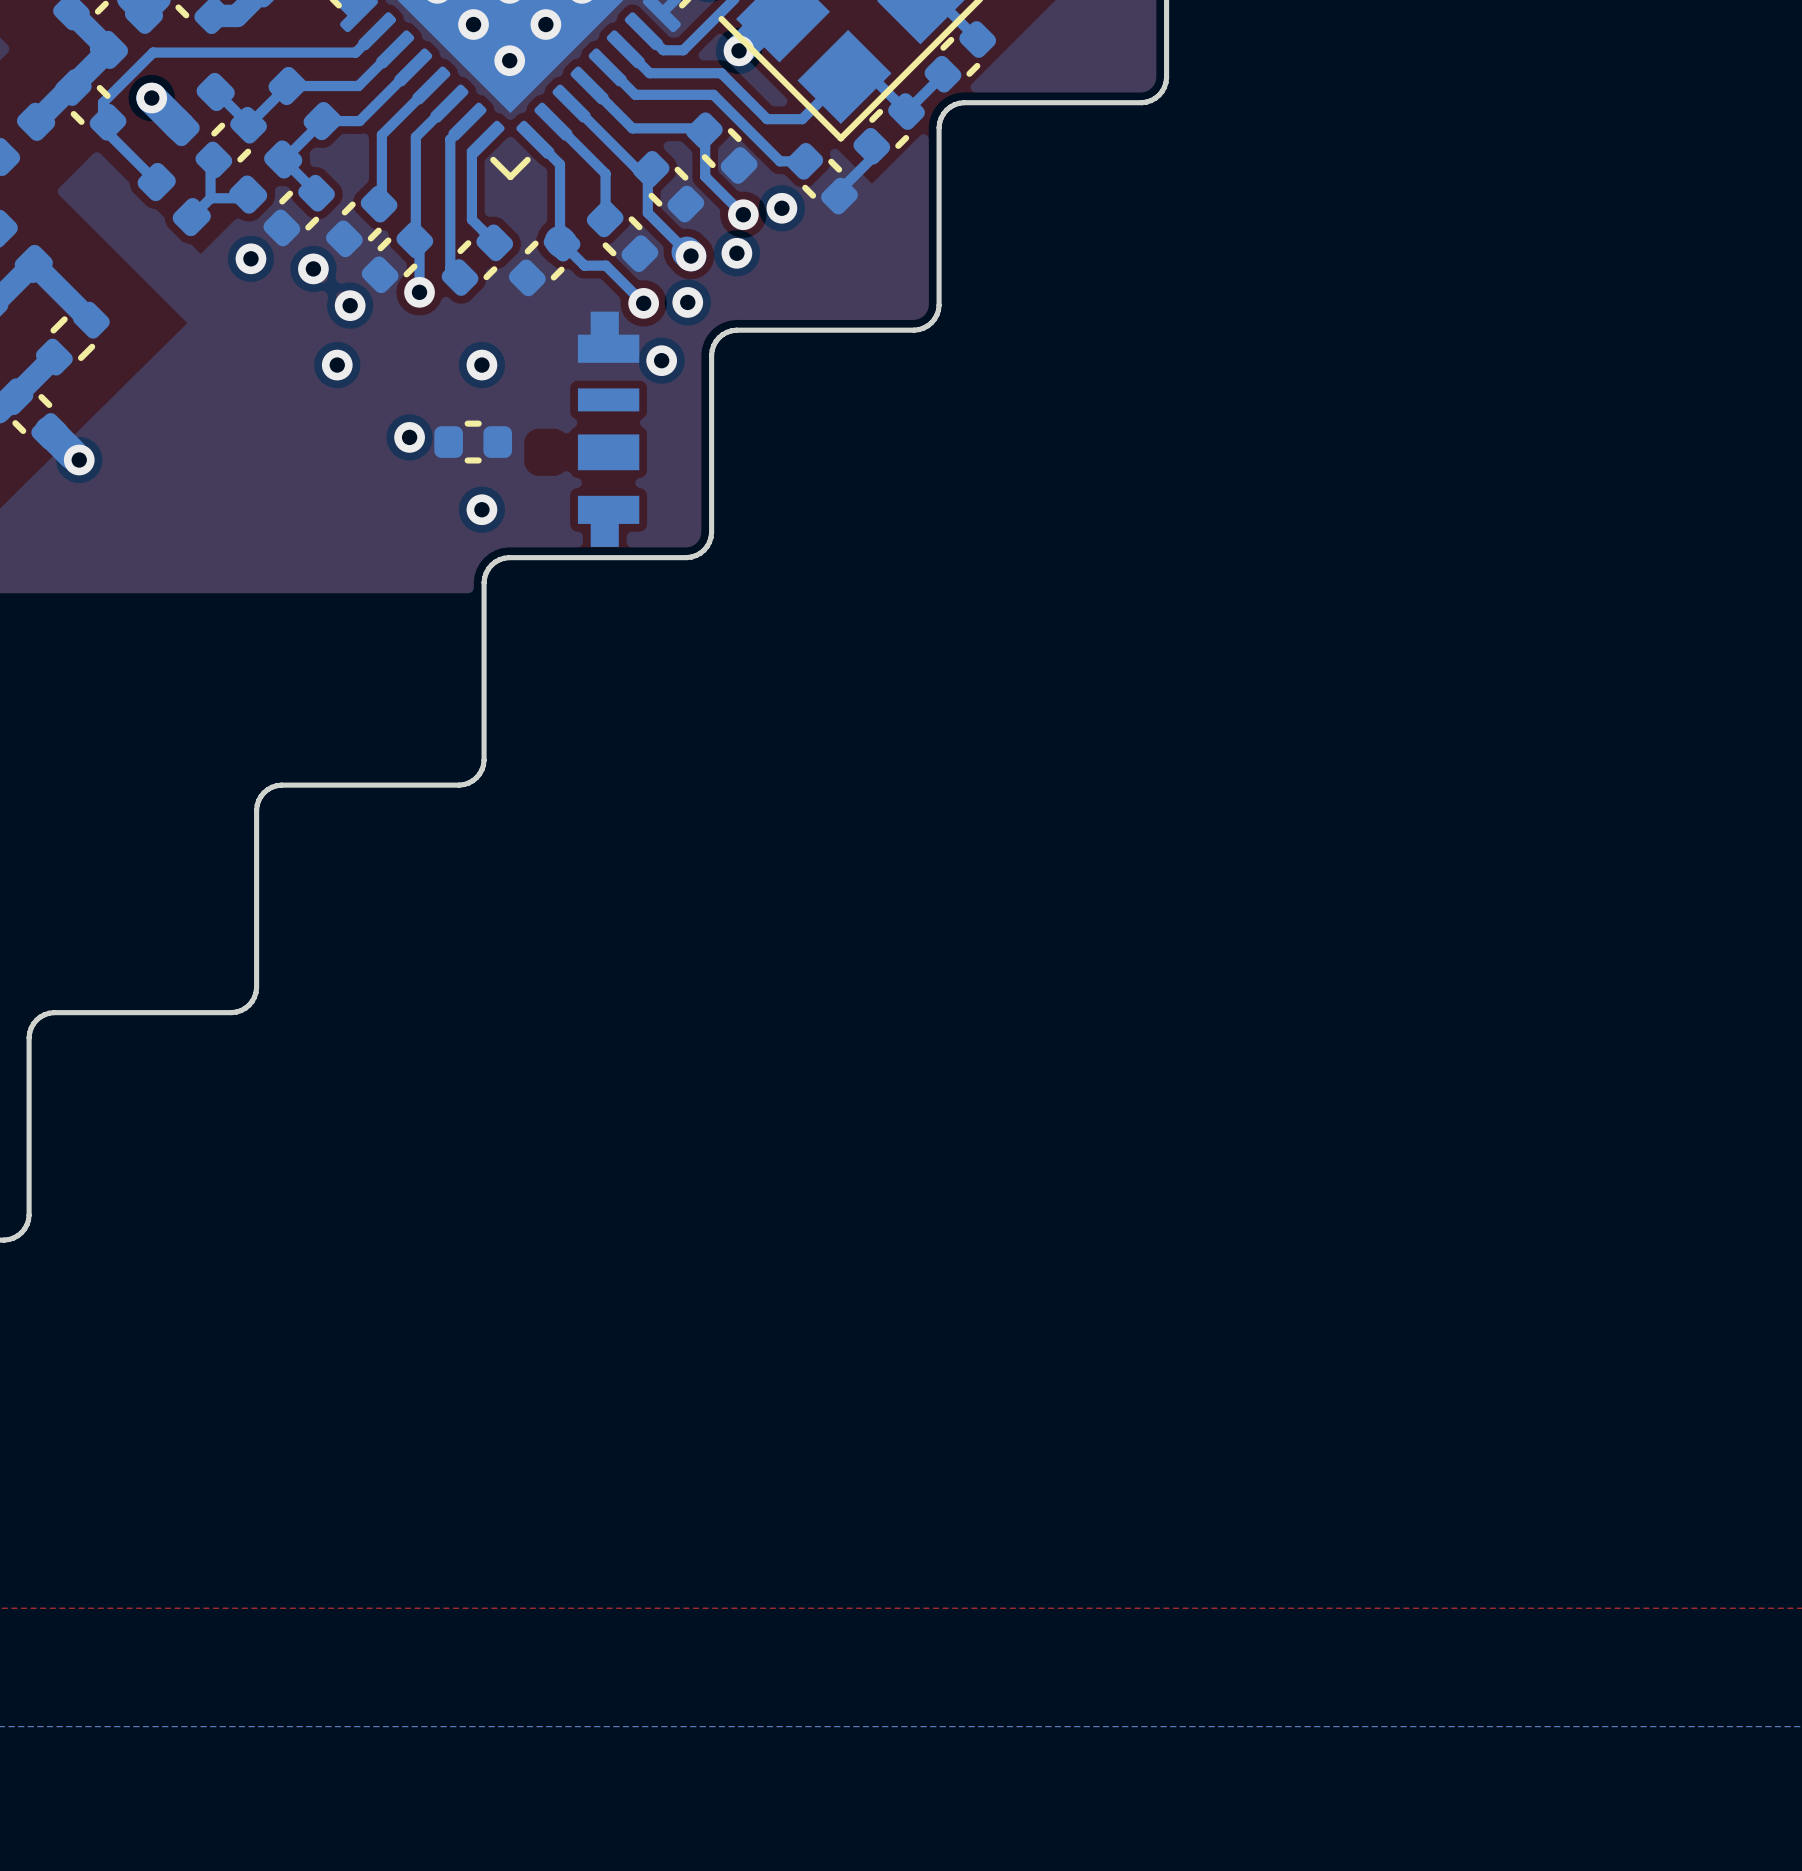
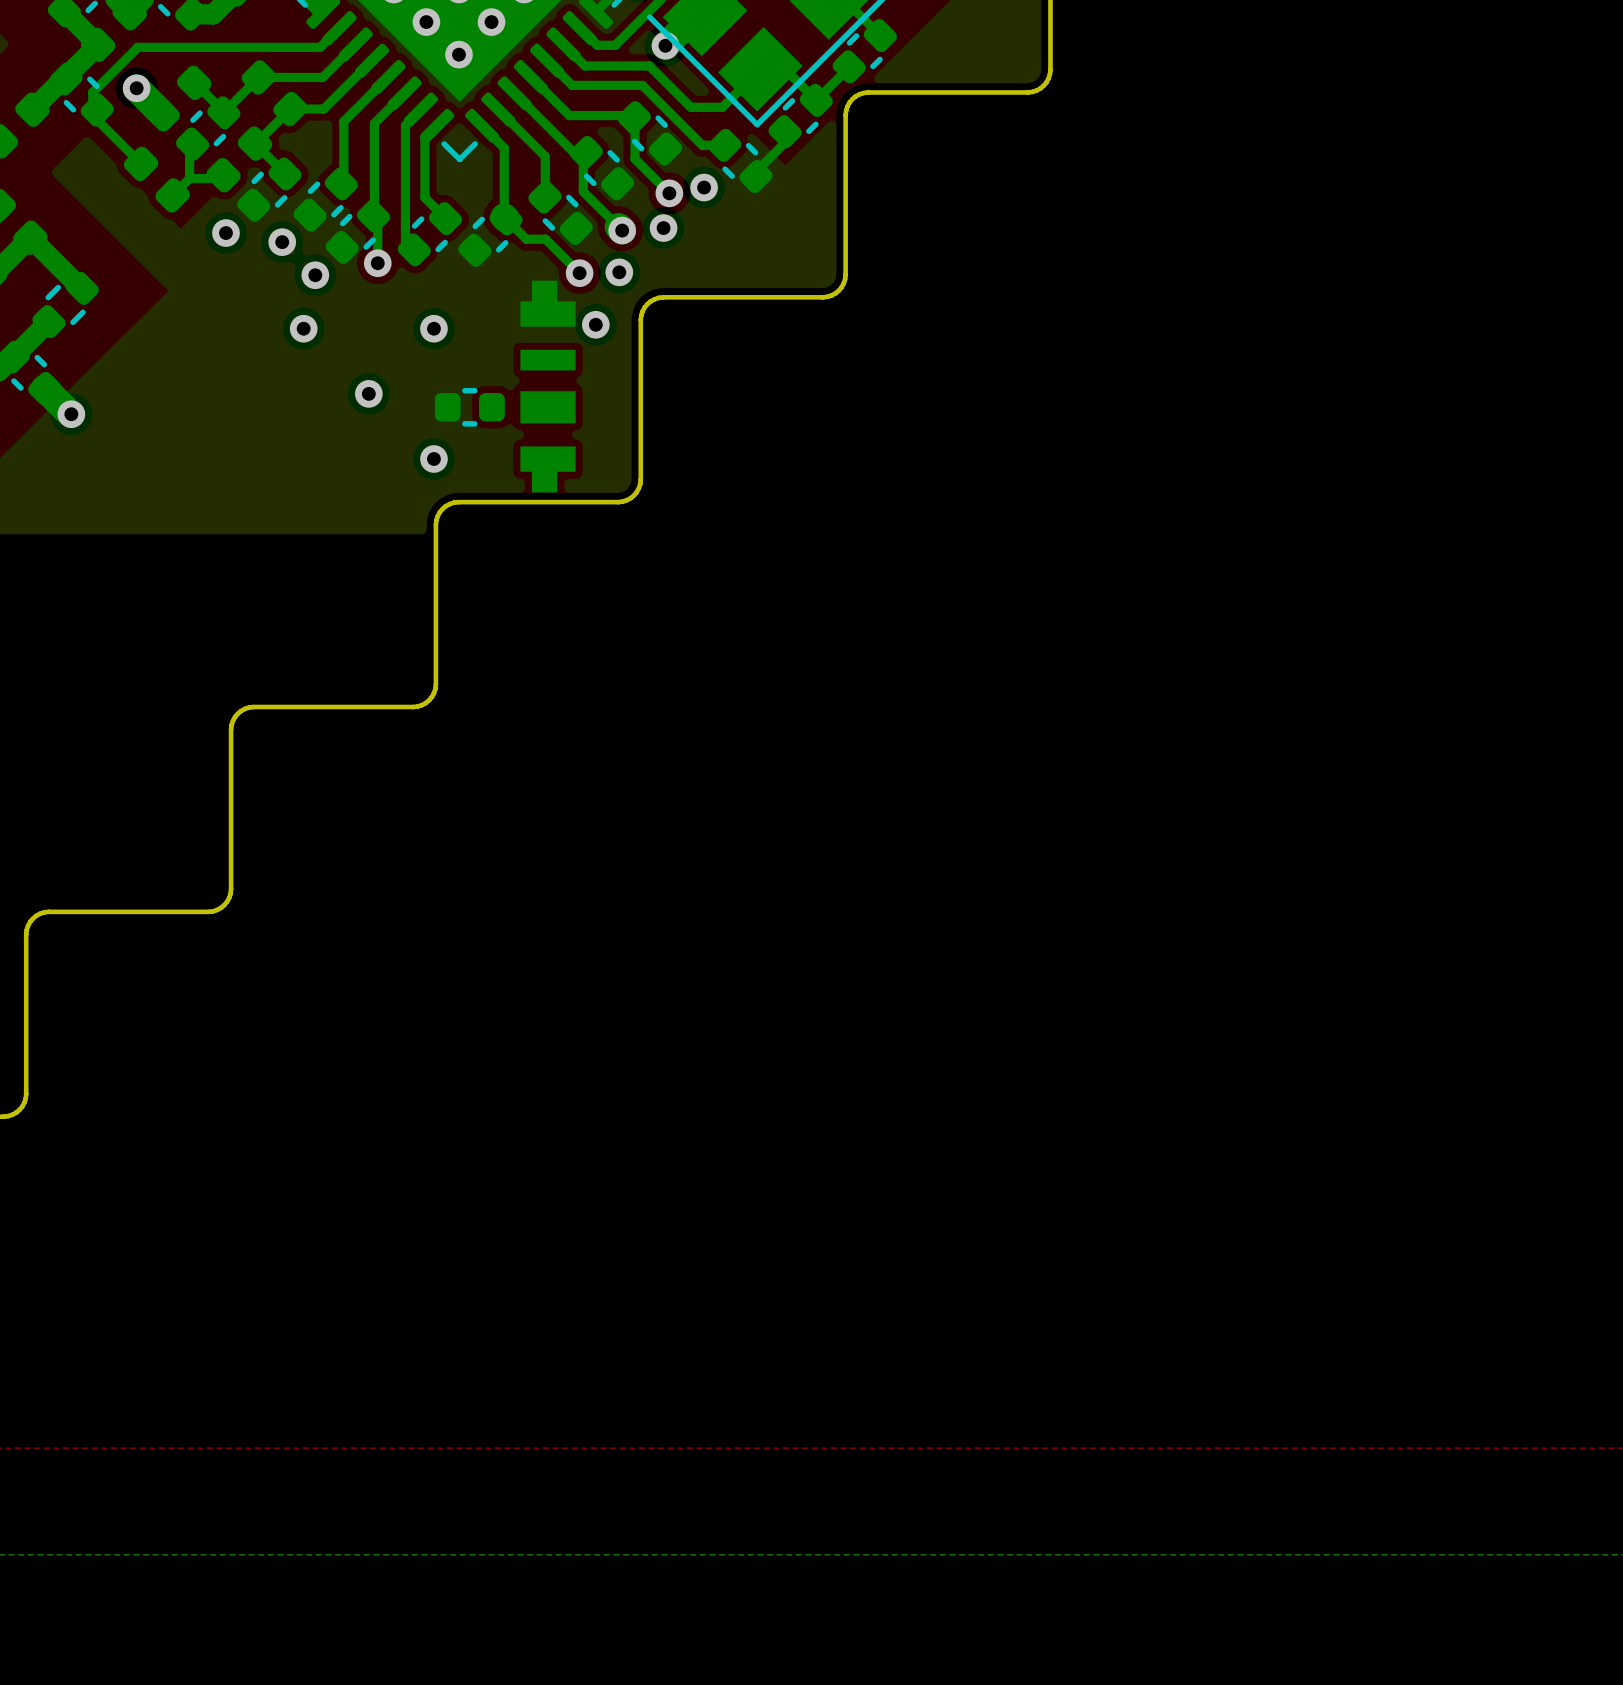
part position: (473, 442) -> (469, 407)

